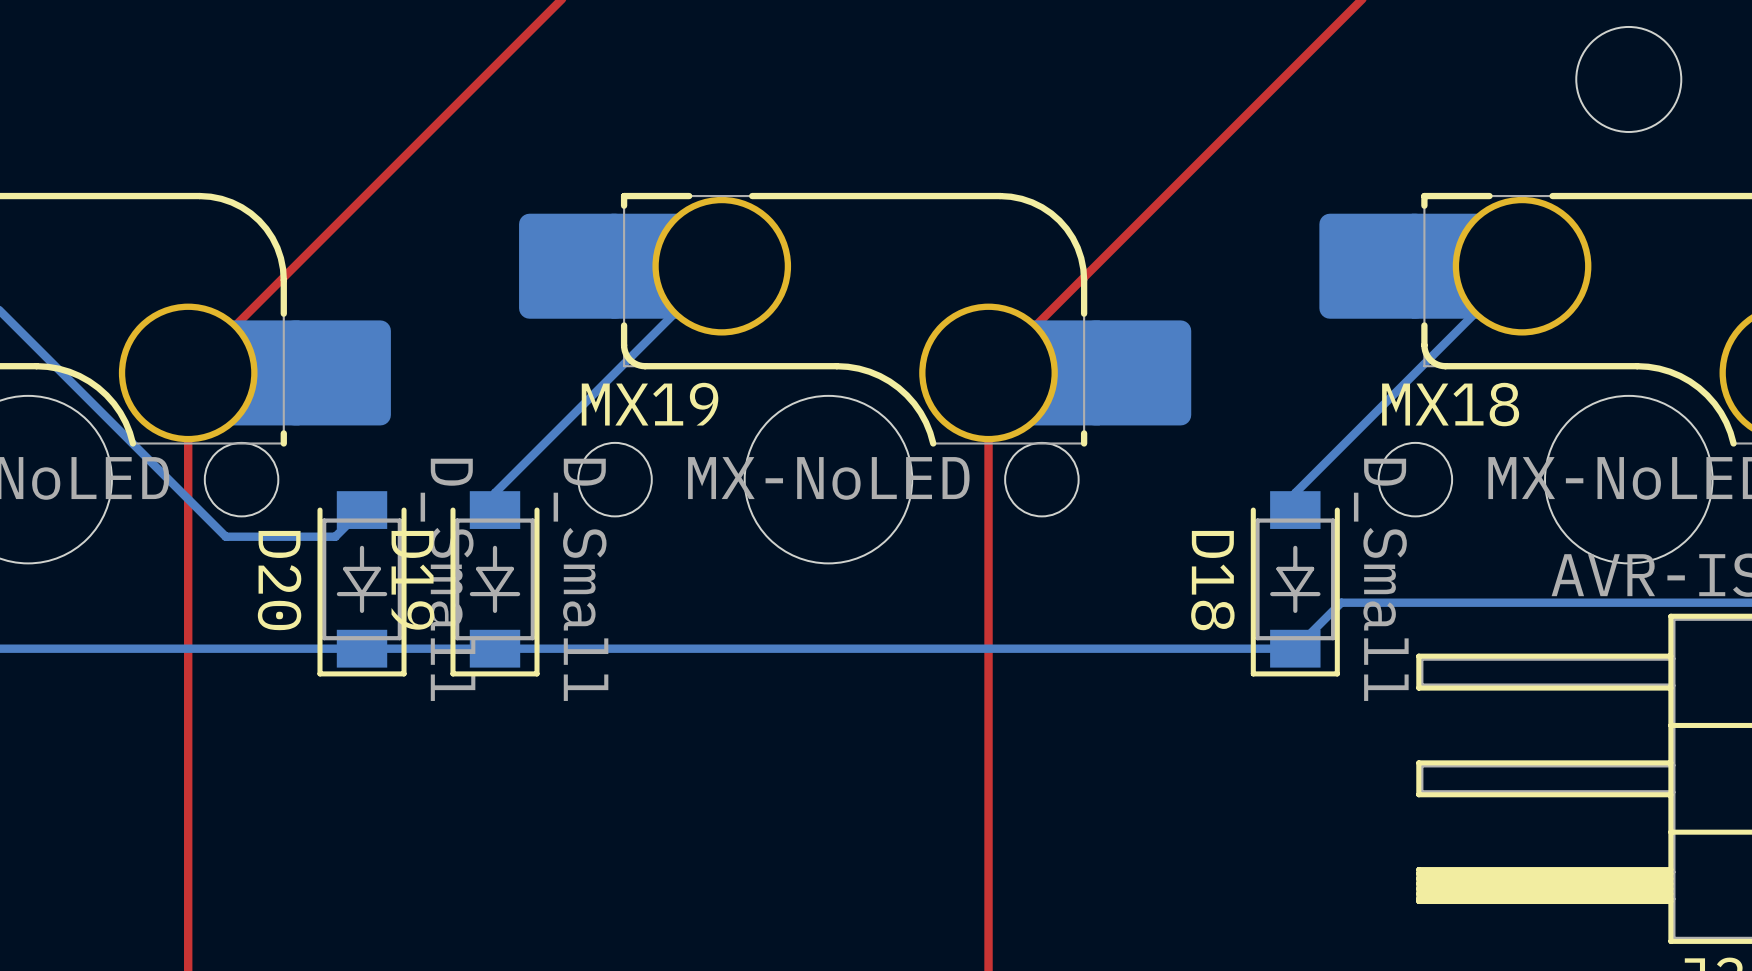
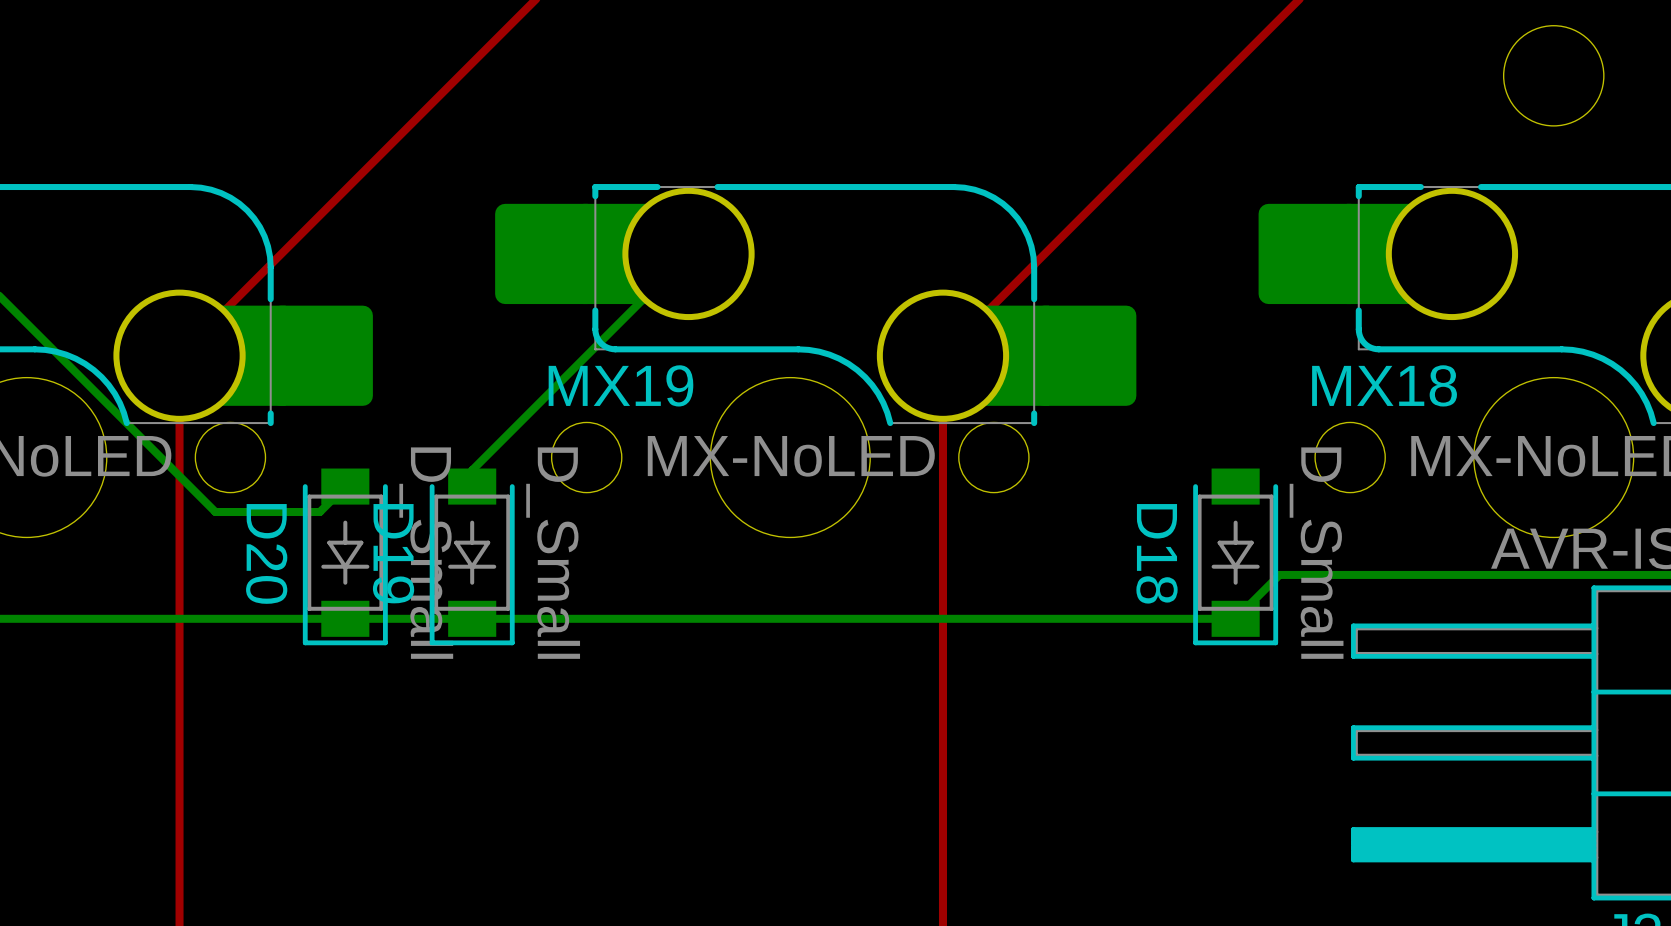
bottom track: (1522, 266) (1295, 492) (1295, 510) -> none

